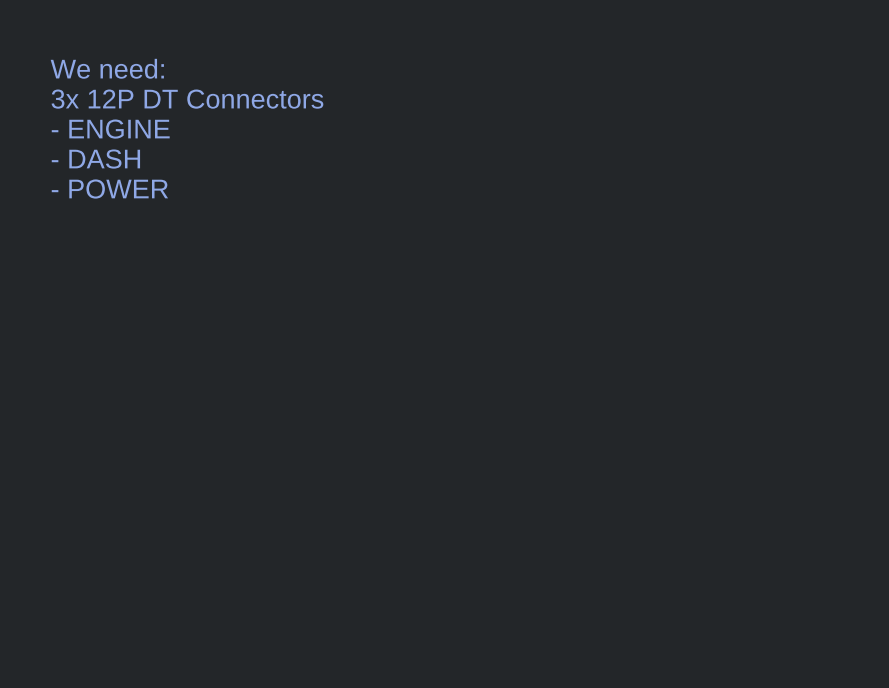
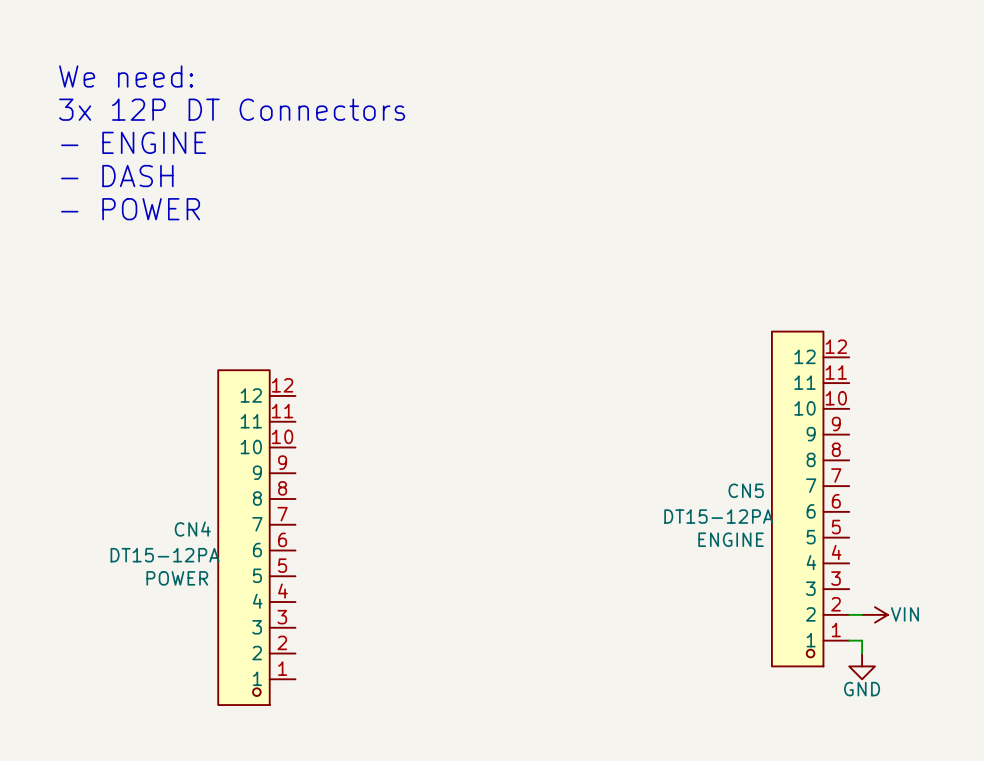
CN5: none -> DT15-12PA (810, 499)
CN4: none -> DT15-12PA (256, 537)
wire: none -> (849, 614) (862, 614)
power symbol: none -> VIN (874, 614)
wire: none -> (849, 640) (862, 640) (862, 653)
power symbol: none -> GND (862, 666)

